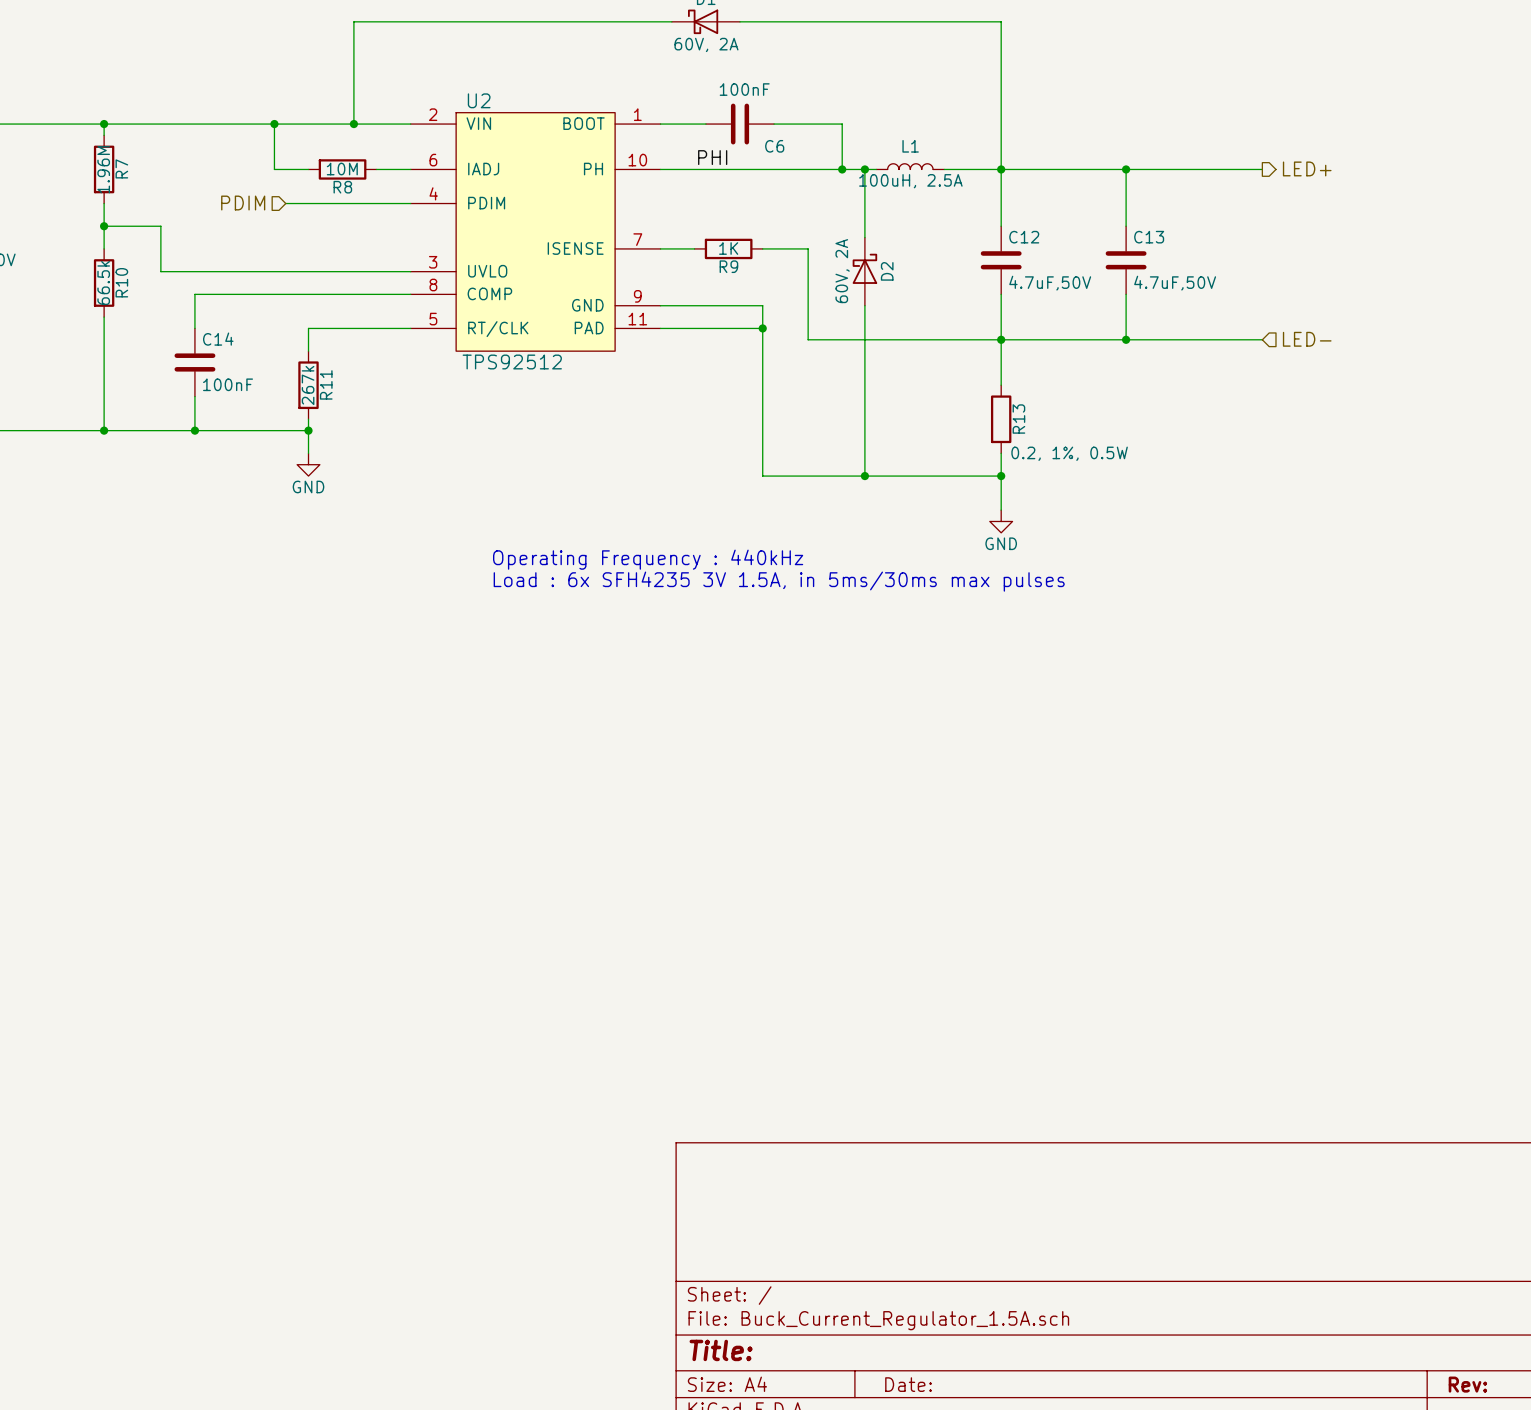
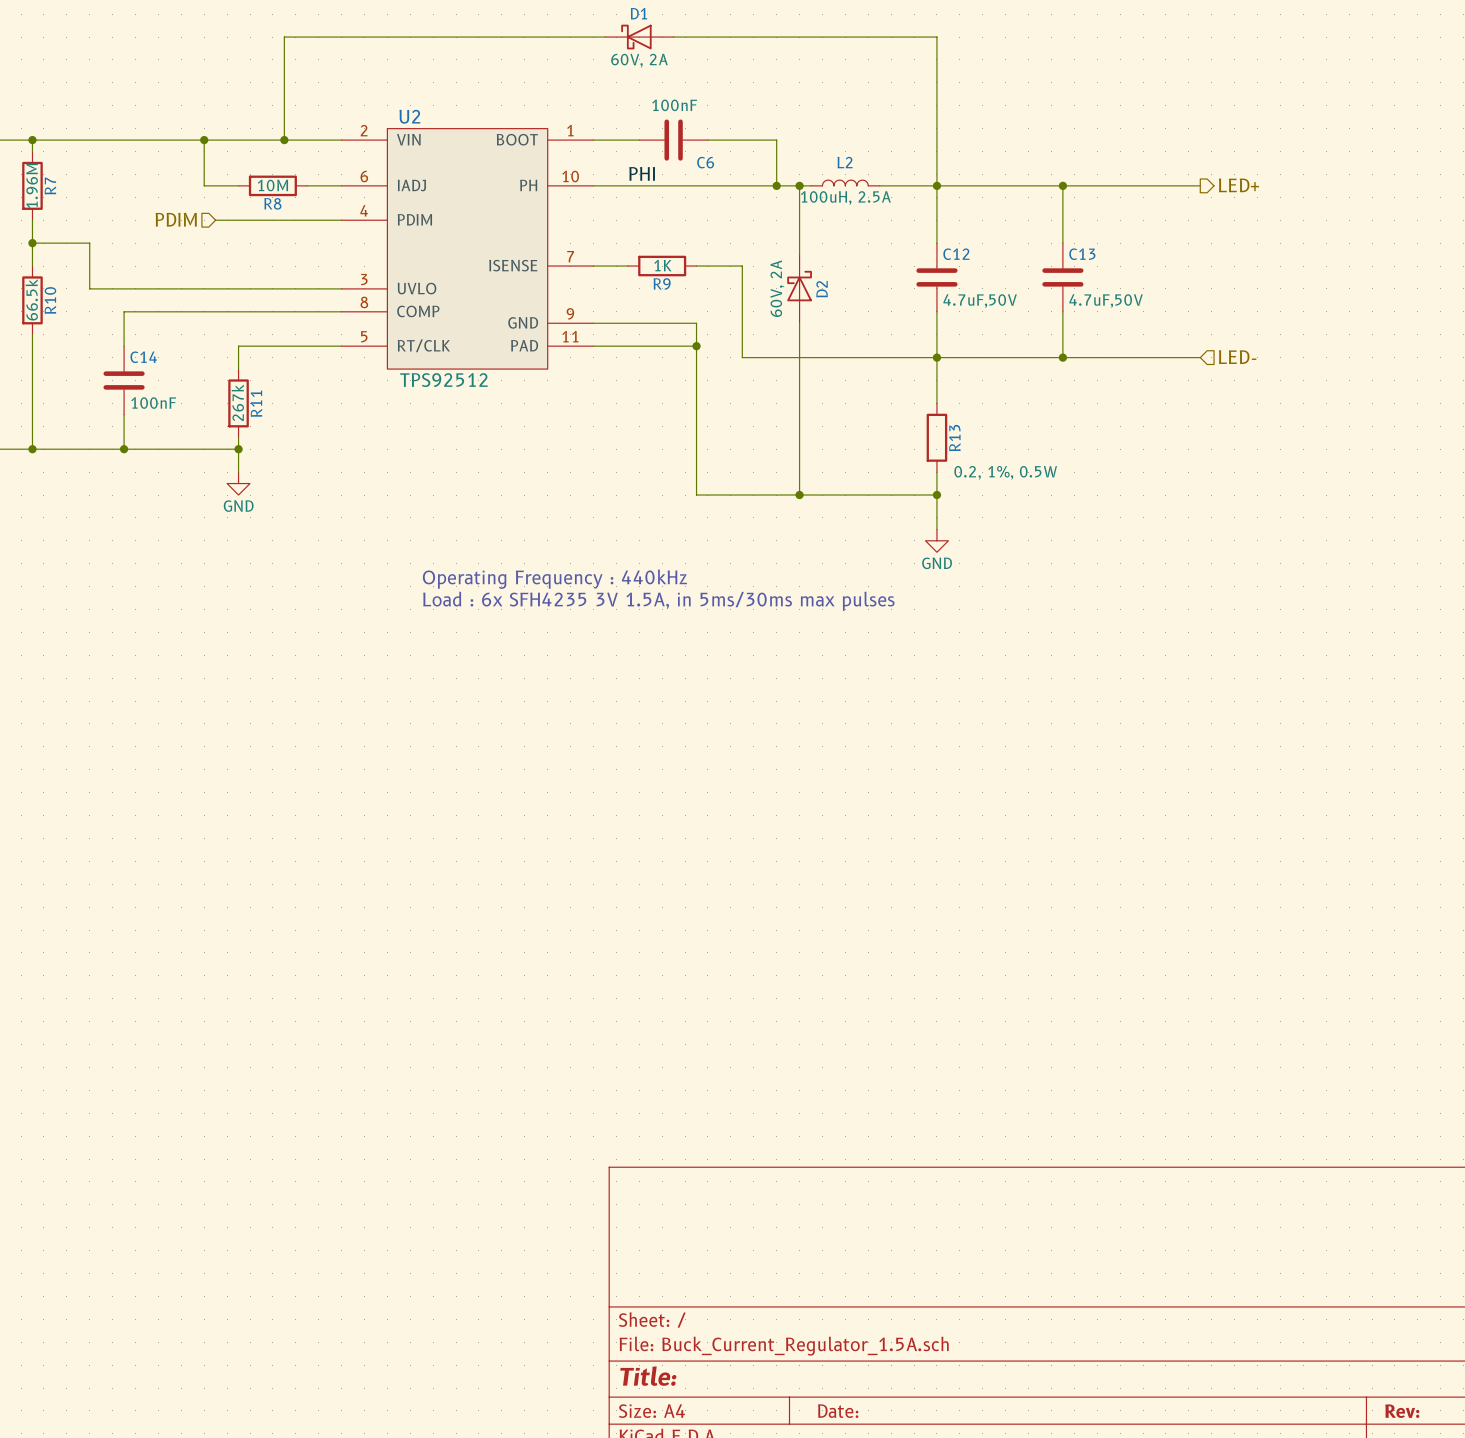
L1 name: L1 (910, 146) -> L2 (845, 162)

